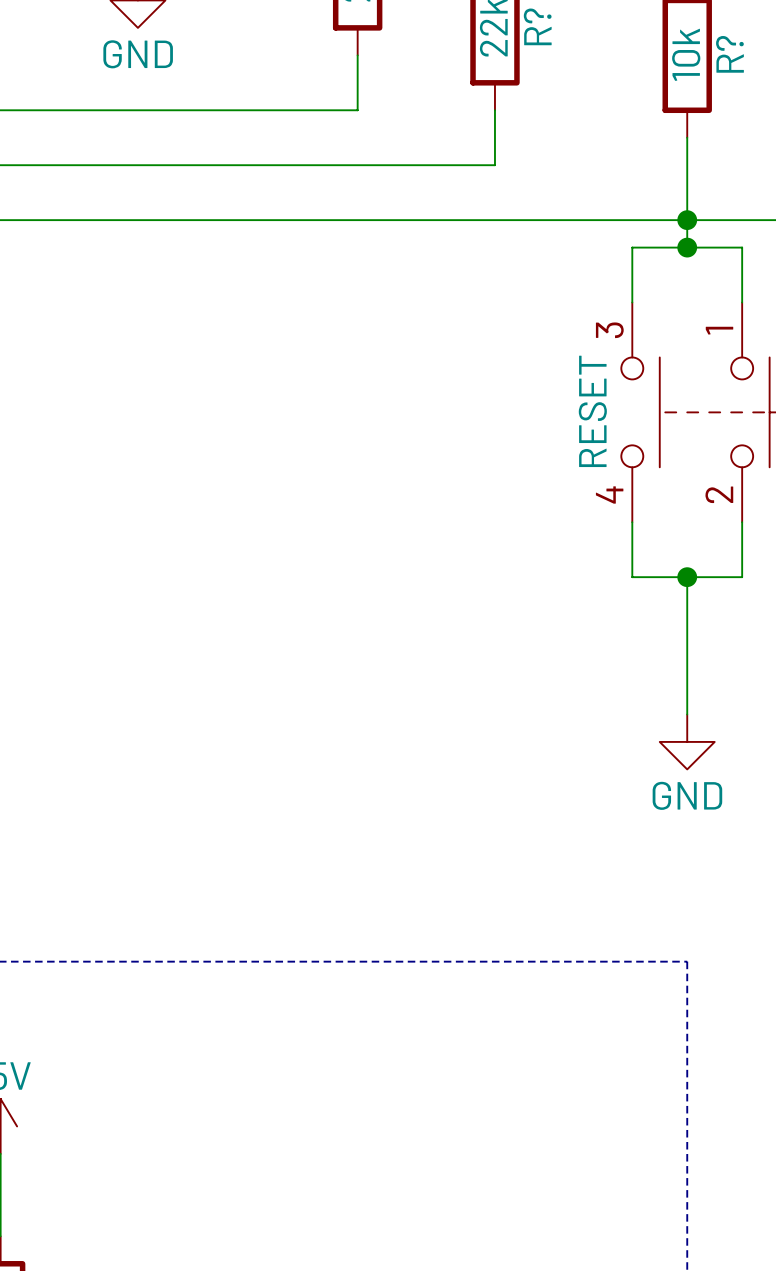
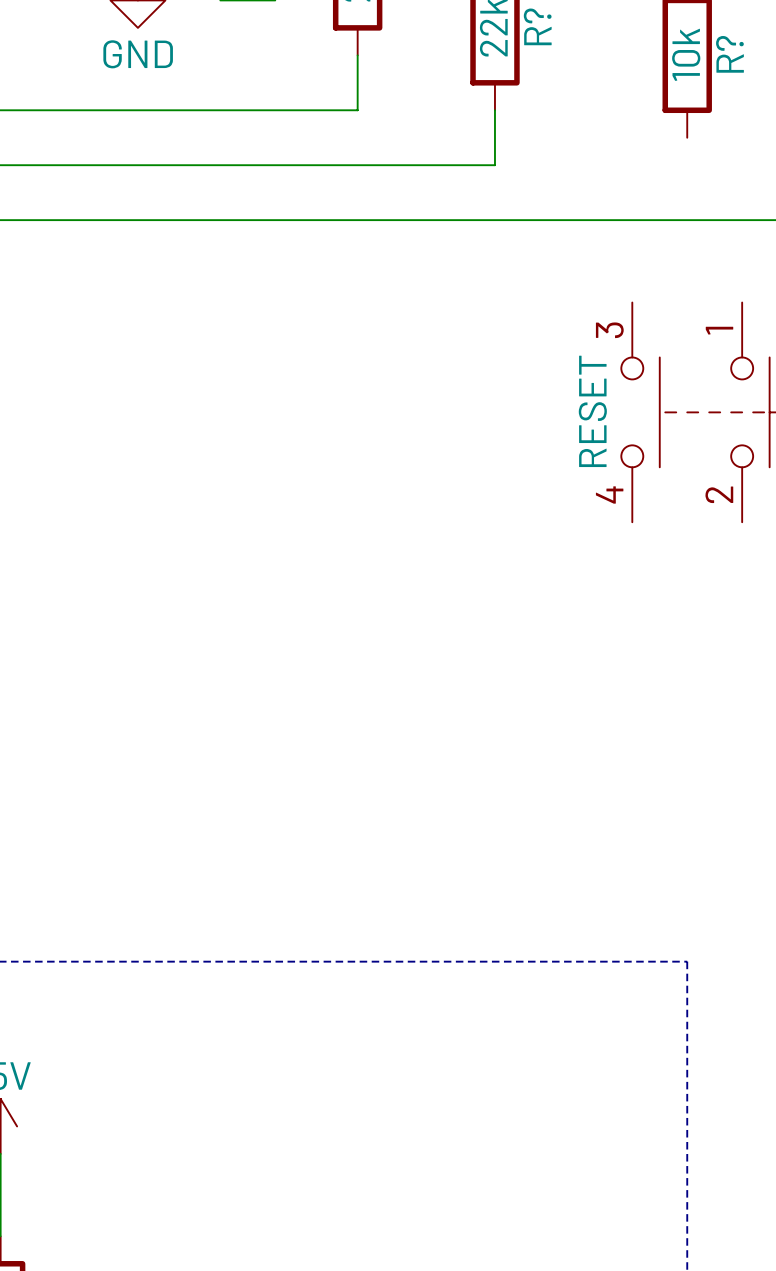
wire: none -> (220, 0) (275, 0)
wire: (687, 137) (687, 247) -> none
junction: (687, 220) -> none
junction: (687, 247) -> none
wire: (632, 302) (632, 247) (742, 247) (742, 302) -> none
wire: (632, 522) (632, 577) (742, 577) (742, 522) -> none
wire: (687, 577) (687, 714) -> none
junction: (687, 577) -> none
power symbol: GND (687, 741) -> none

